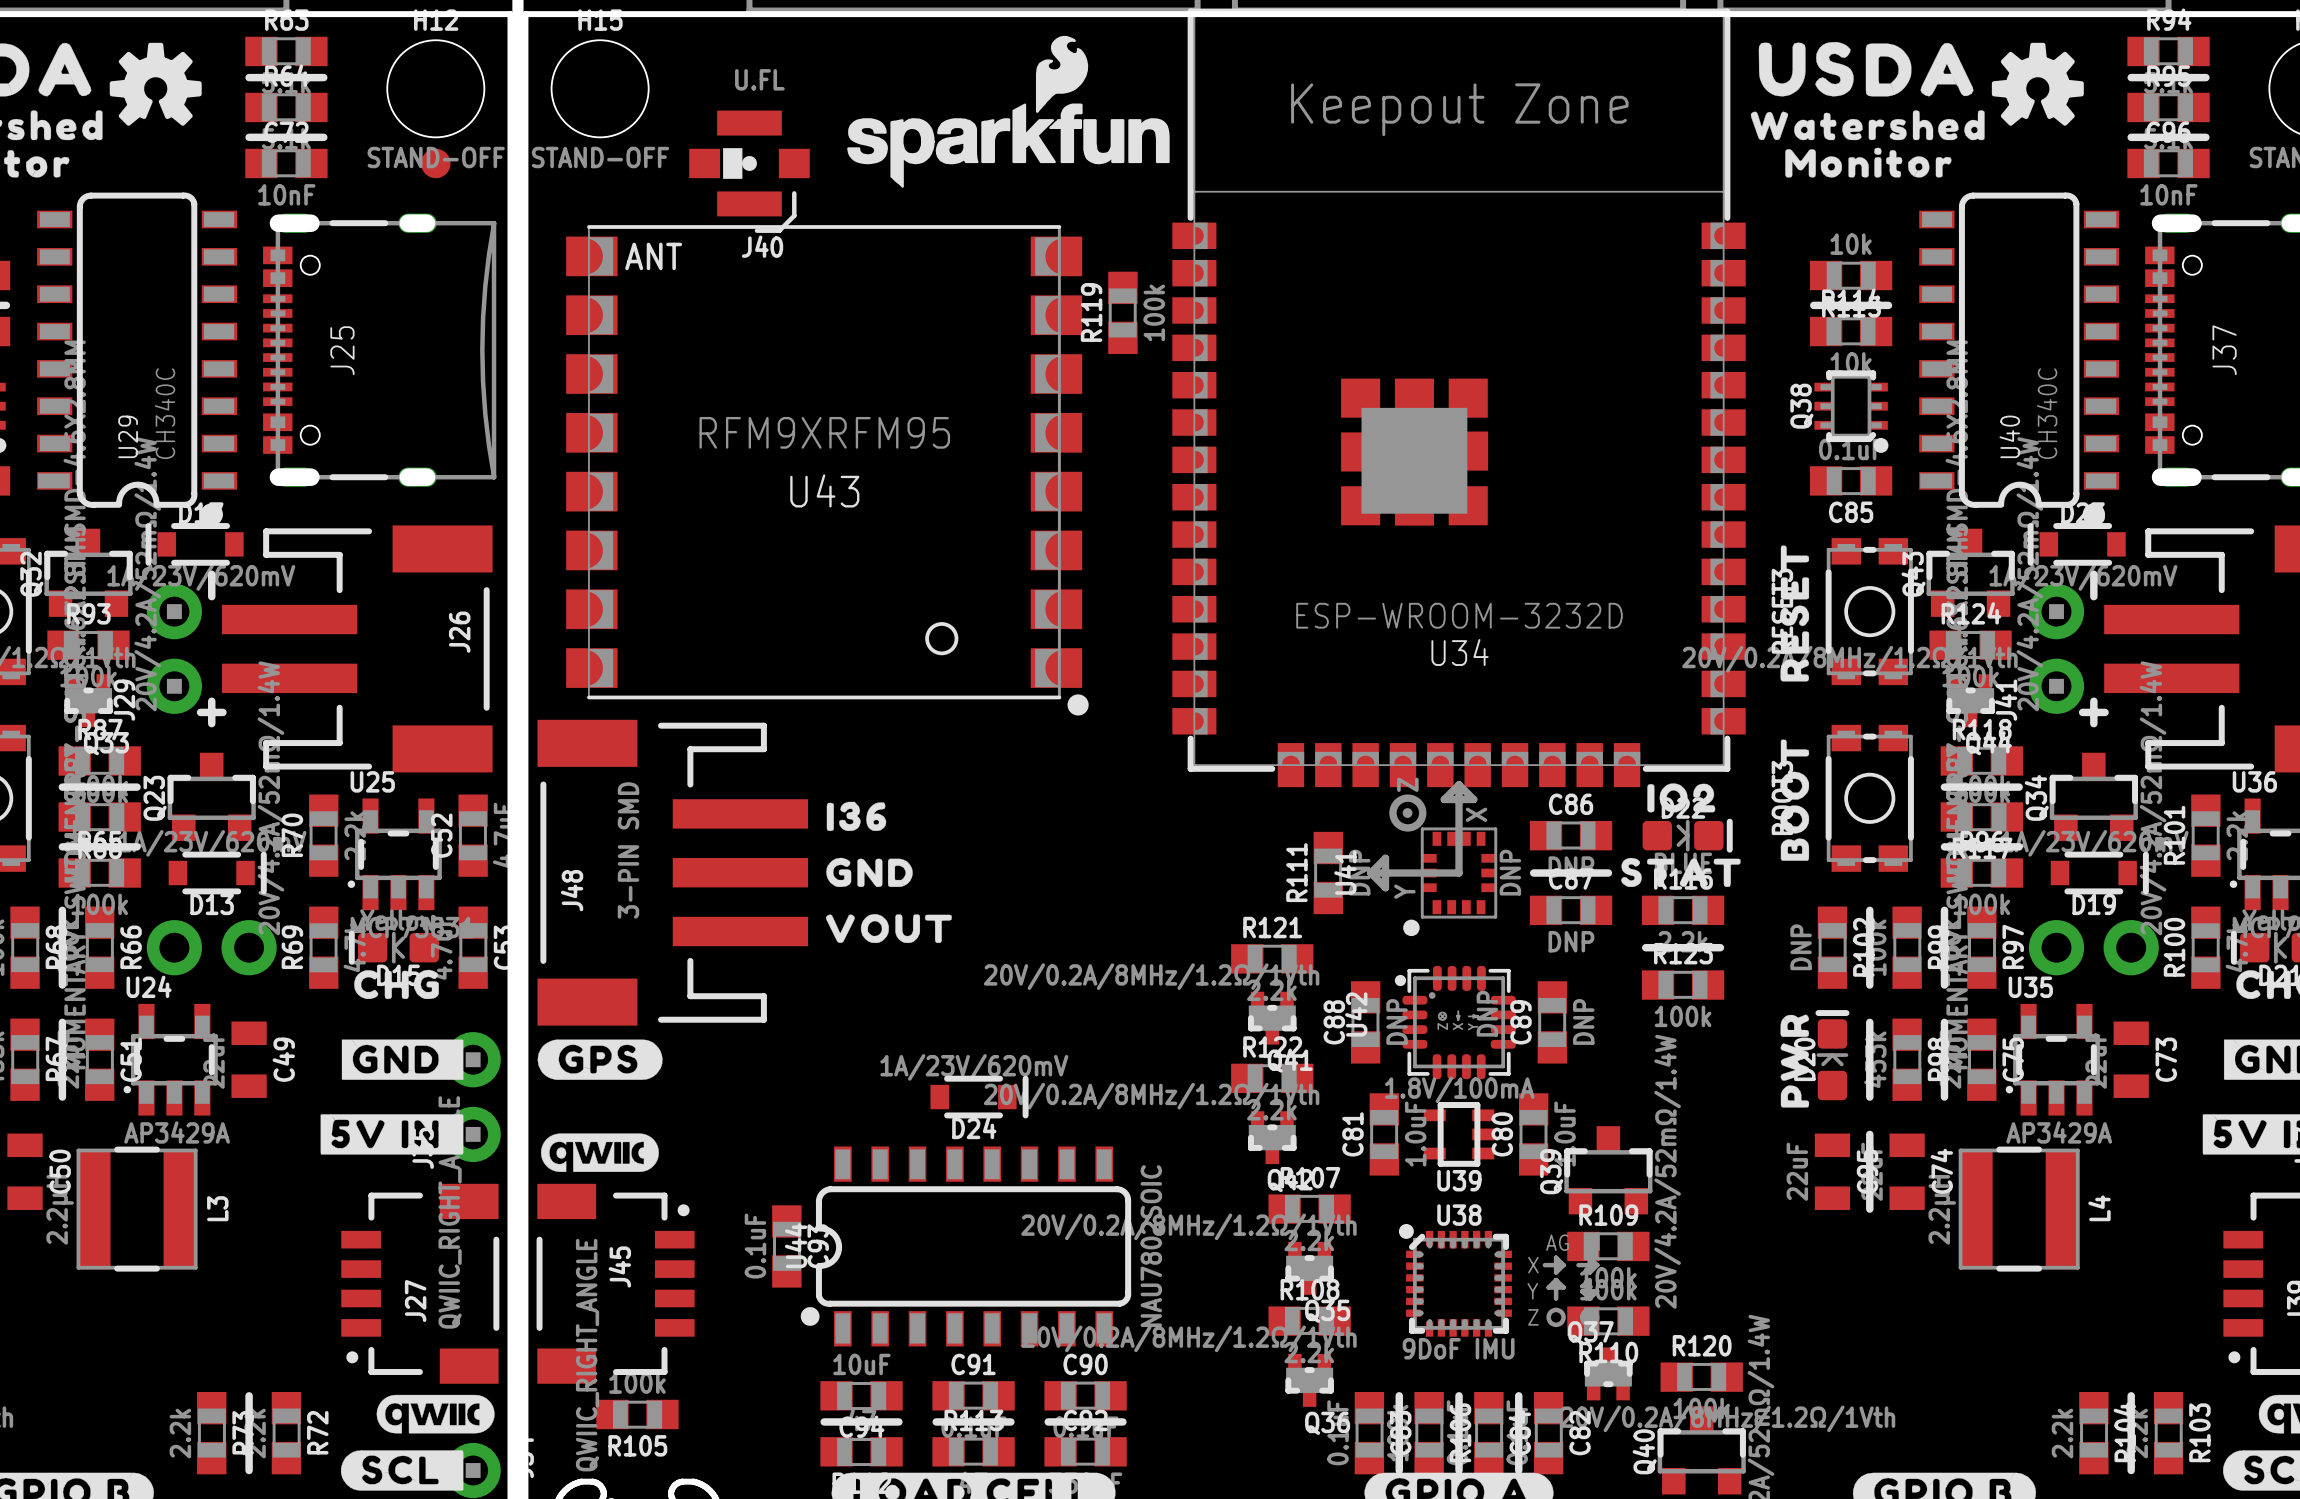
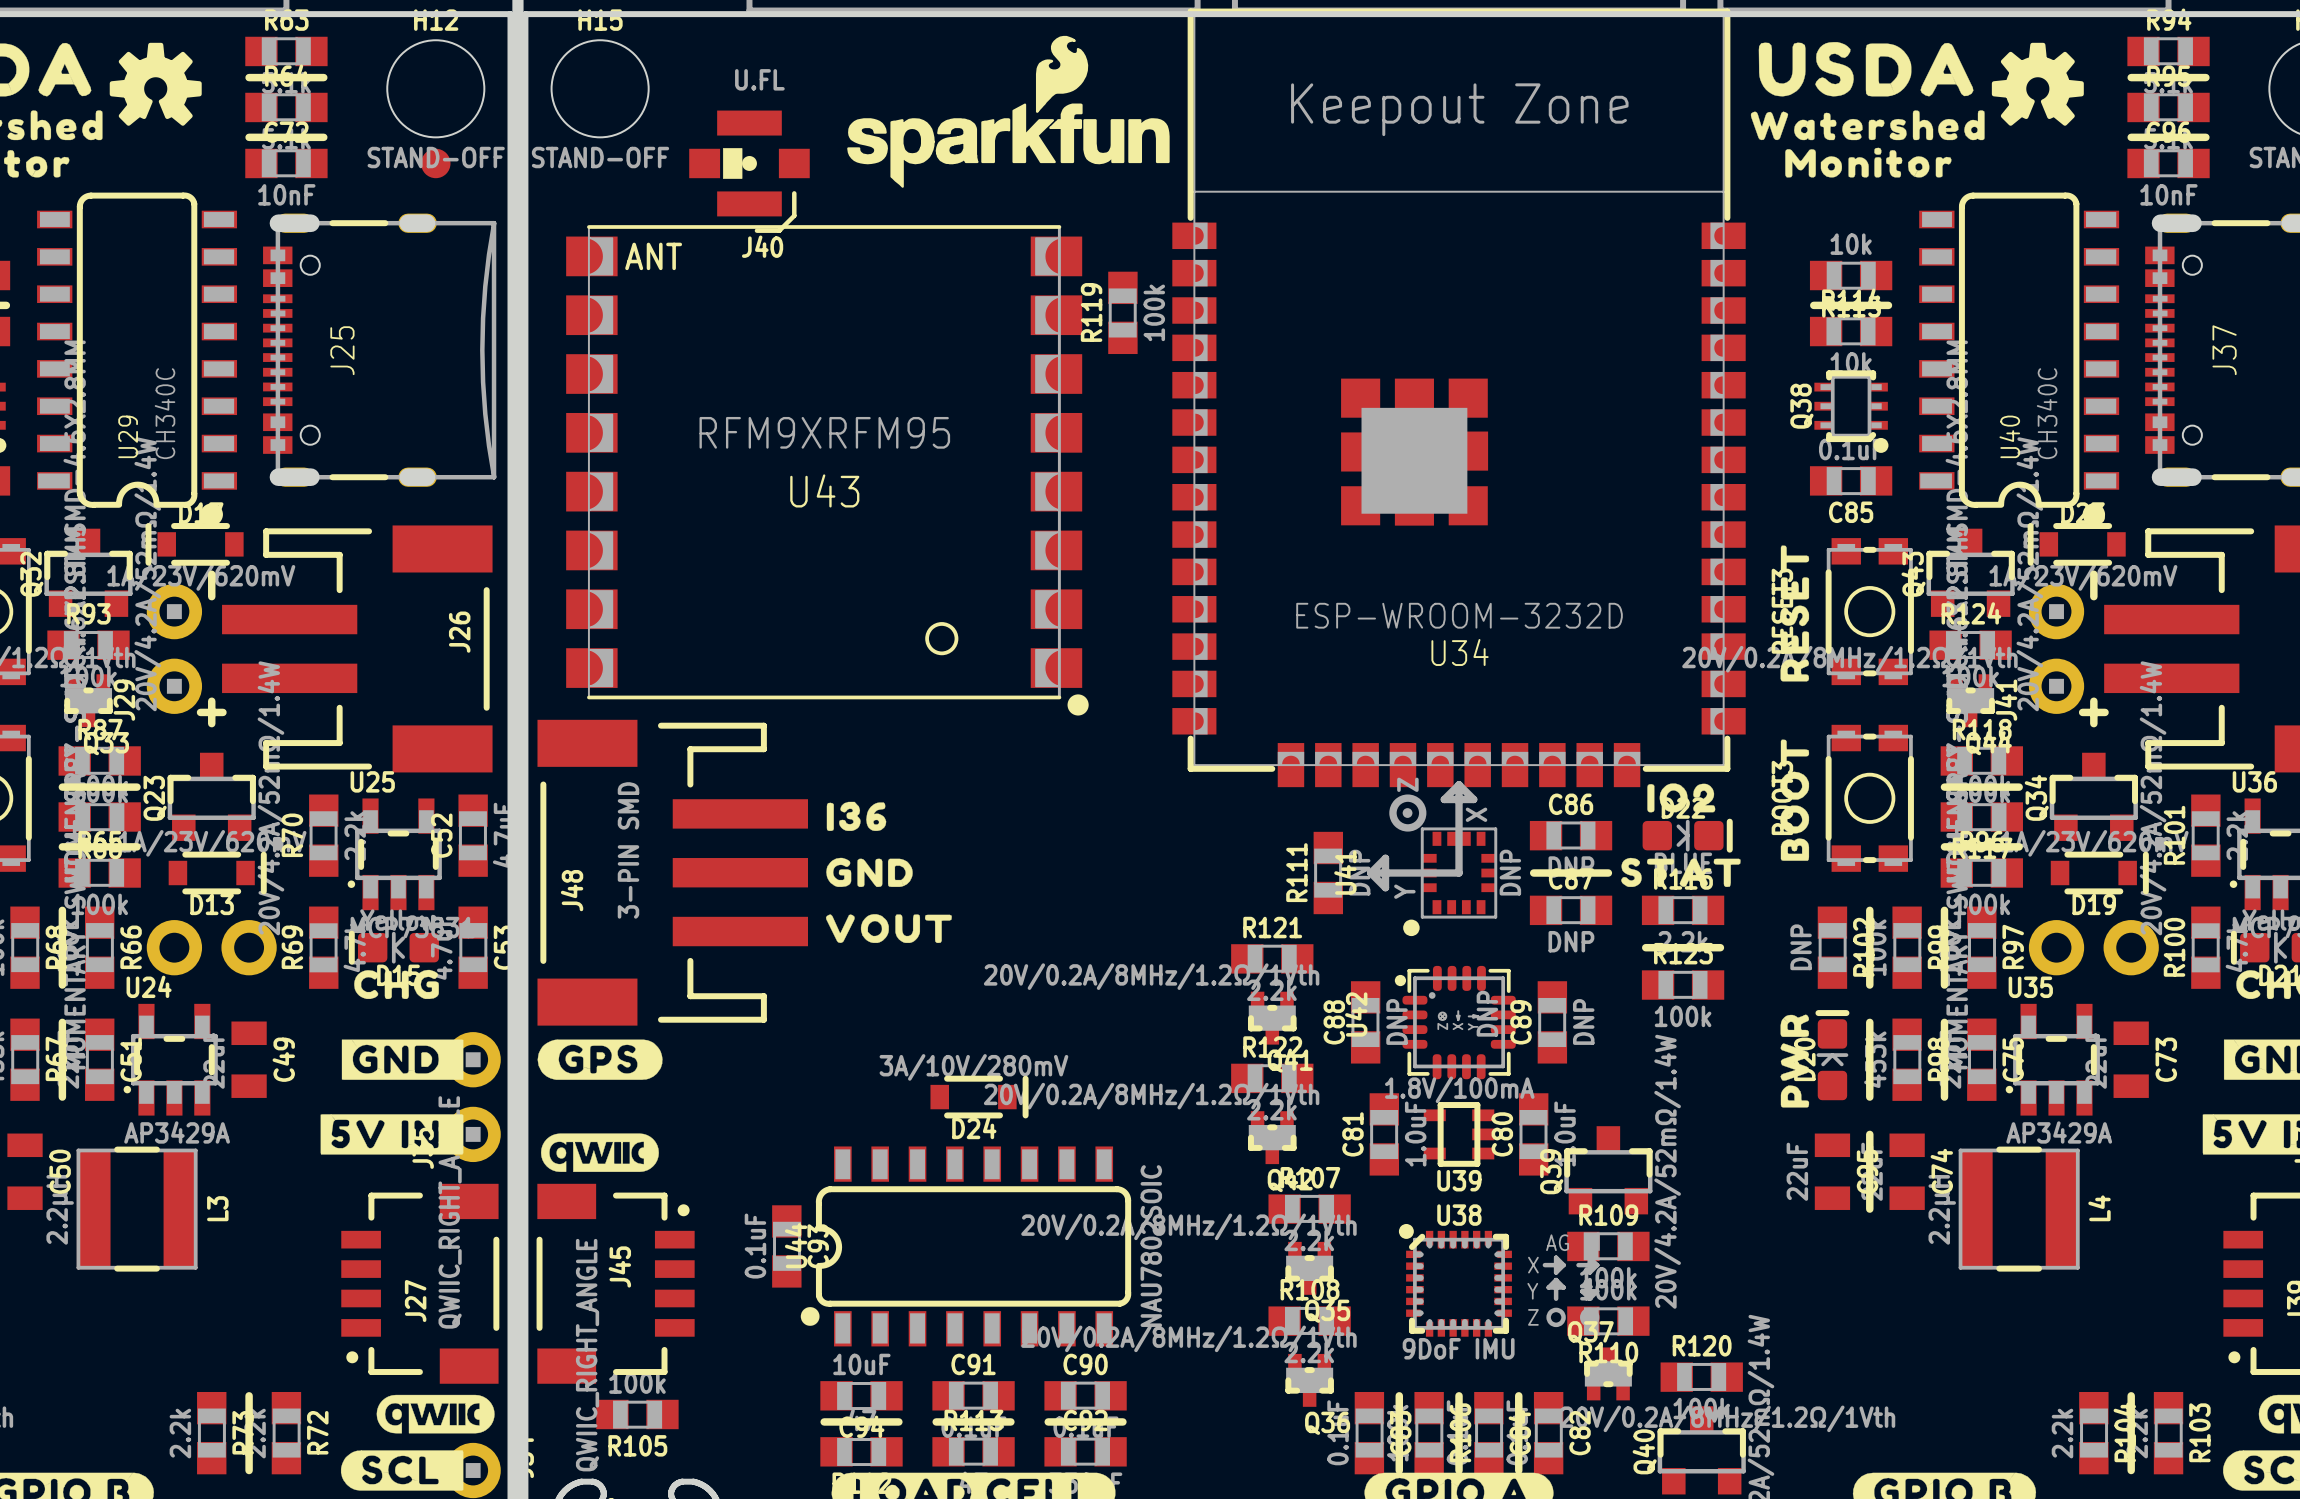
D24 value: 1A/23V/620mV (974, 1067) -> 3A/10V/280mV (973, 1067)

